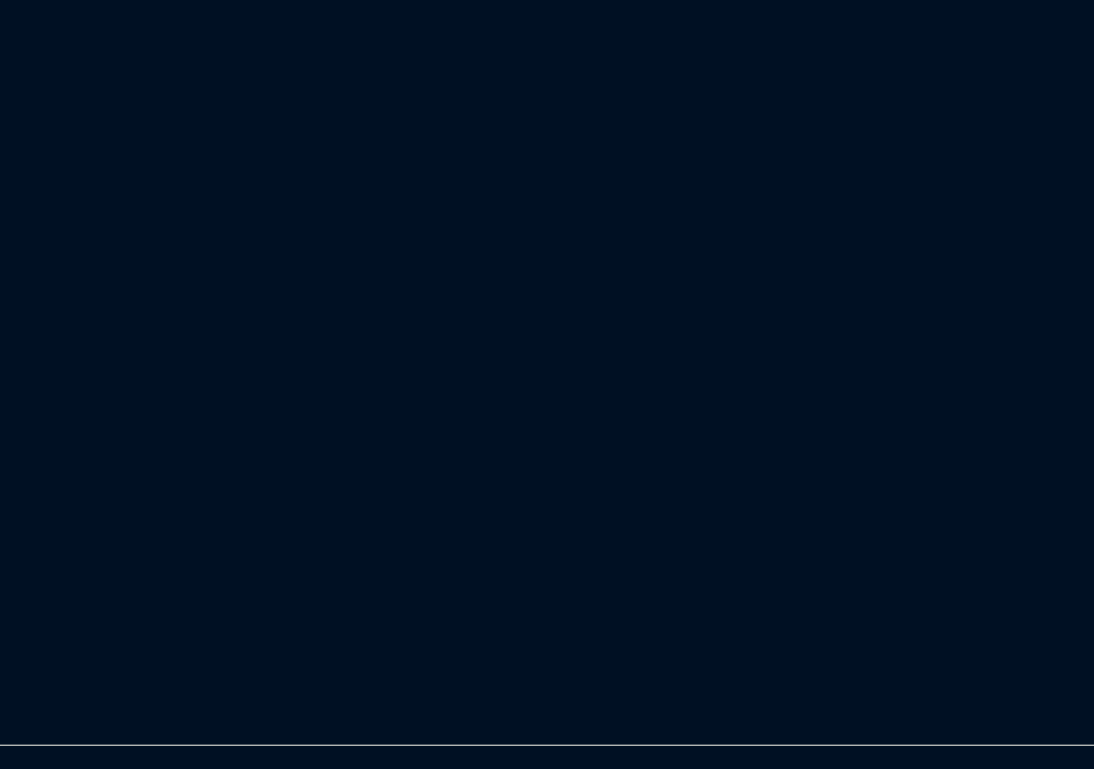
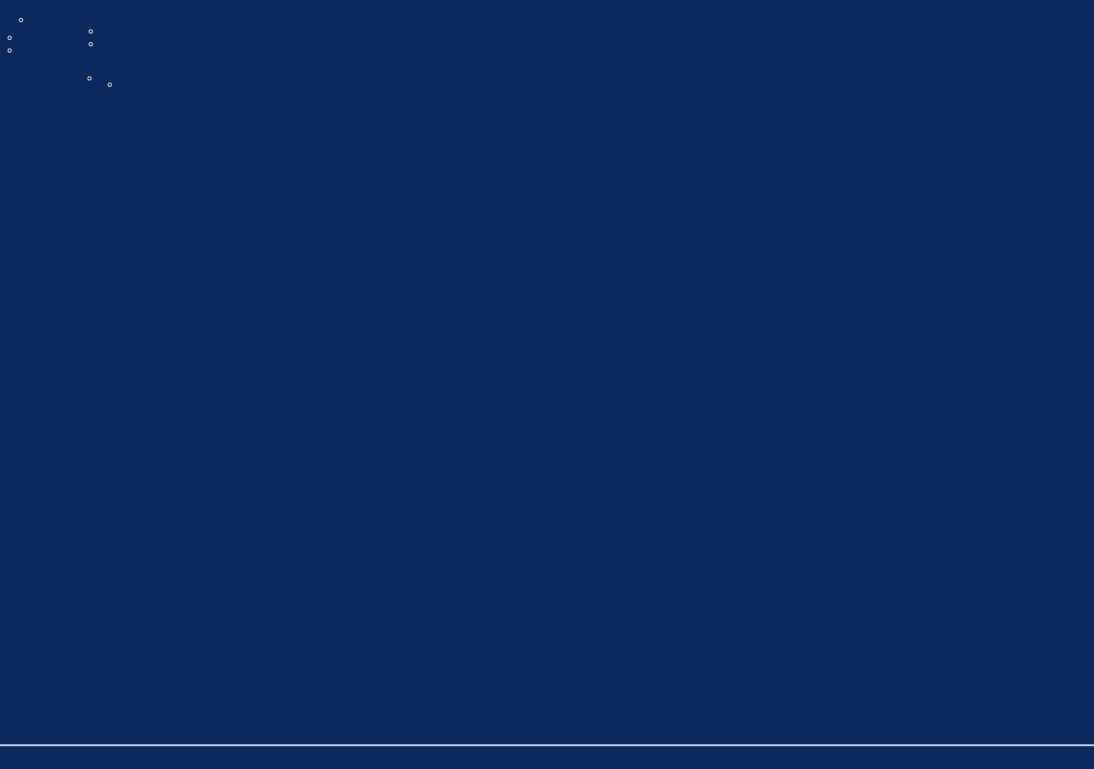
via: none -> (21, 20)
via: none -> (90, 31)
via: none -> (9, 37)
via: none -> (90, 44)
via: none -> (9, 50)
via: none -> (89, 78)
via: none -> (109, 84)

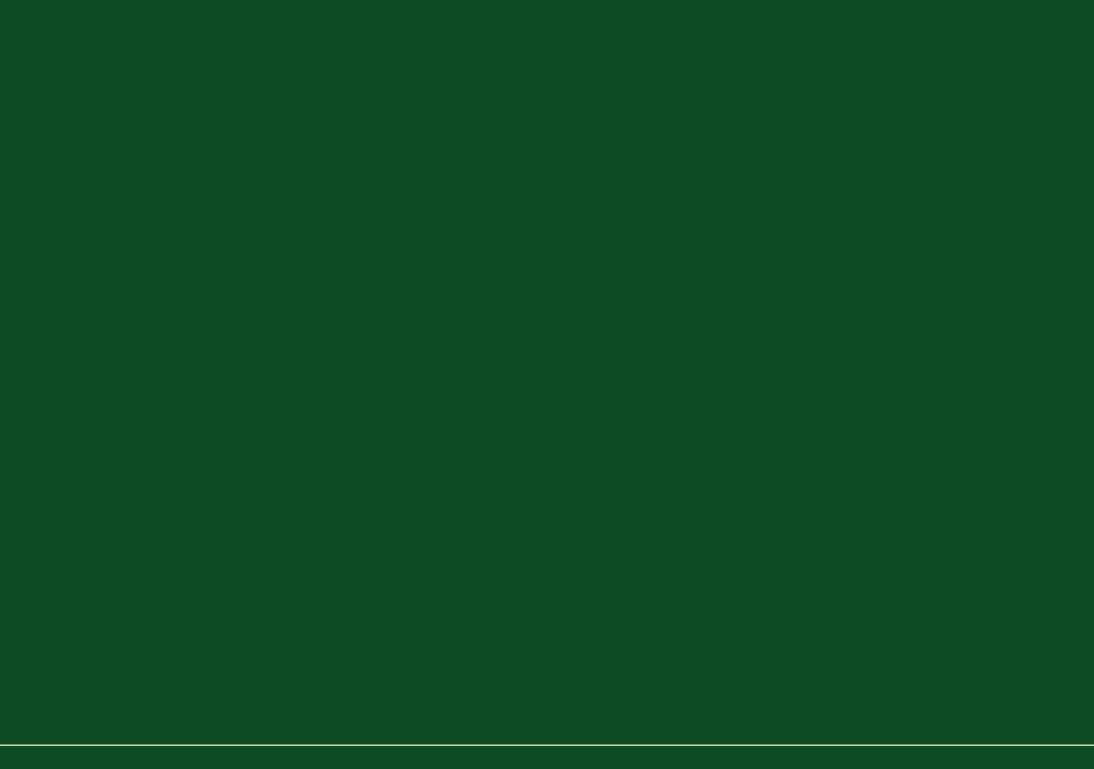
via: (21, 20) -> none
via: (90, 31) -> none
via: (9, 37) -> none
via: (90, 44) -> none
via: (9, 50) -> none
via: (89, 78) -> none
via: (109, 84) -> none

